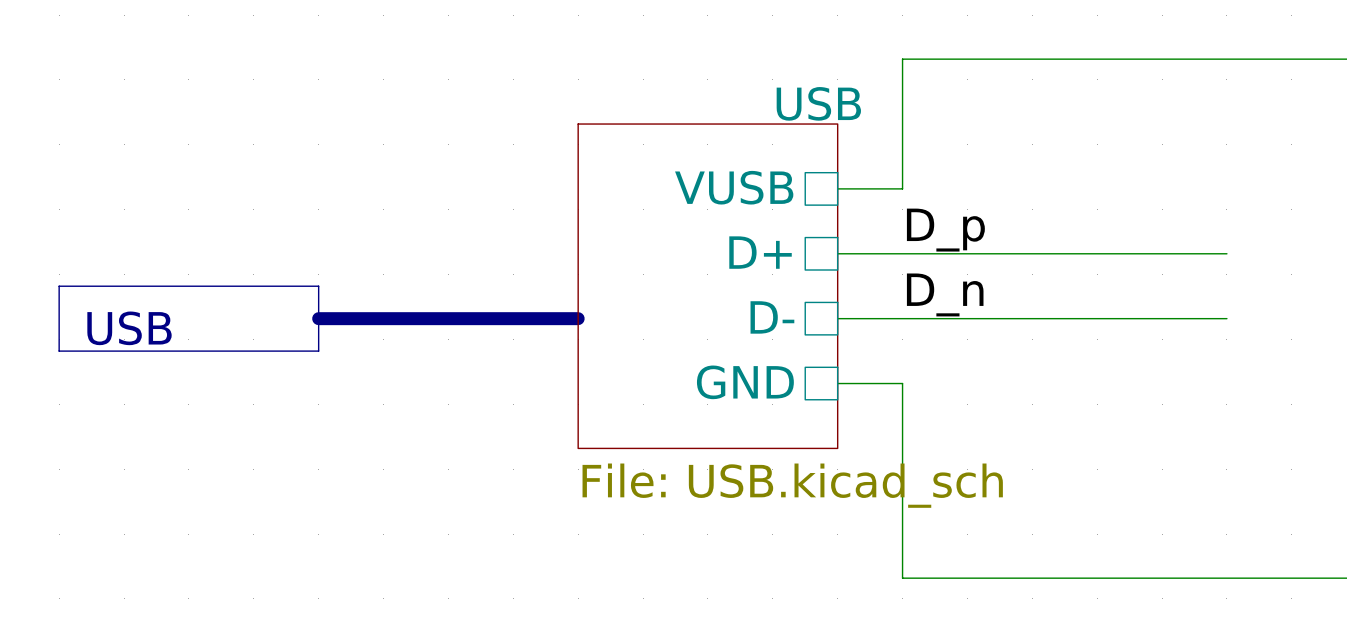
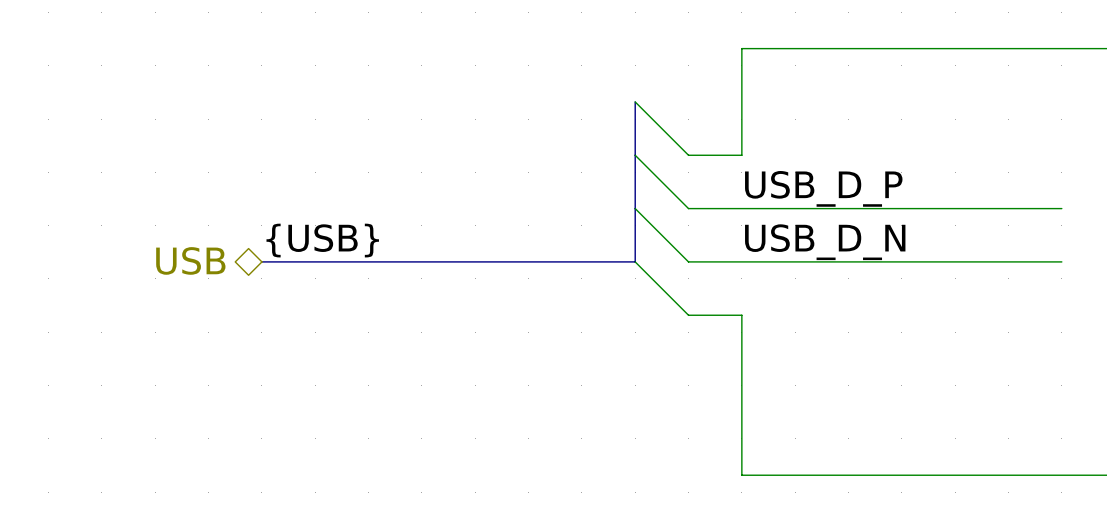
wire: none -> (635, 101) (688, 155)
bus: none -> (635, 101) (635, 261) (261, 261)
sheet pin: VUSB (734, 187) -> none
wire: none -> (635, 155) (688, 208)
label: D_p (945, 230) -> USB_D_P (823, 188)
sheet pin: D+ (760, 252) -> none
wire: none -> (635, 208) (688, 261)
wire: none -> (1008, 208) (1061, 208)
line: (59, 286) (318, 286) (318, 351) (59, 351) (59, 286) -> none
sheet USB: File: USB.kicad_sch (707, 286) -> none
label: none -> {USB} (322, 240)
label: D_n (945, 294) -> USB_D_N (825, 242)
hierarchical label: none -> USB (190, 260)
sheet pin: D- (772, 317) -> none
line: (318, 318) (578, 318) -> none
wire: none -> (635, 261) (688, 315)
wire: none -> (1008, 261) (1061, 261)
text: USB (129, 328) -> none
sheet pin: GND (745, 382) -> none

